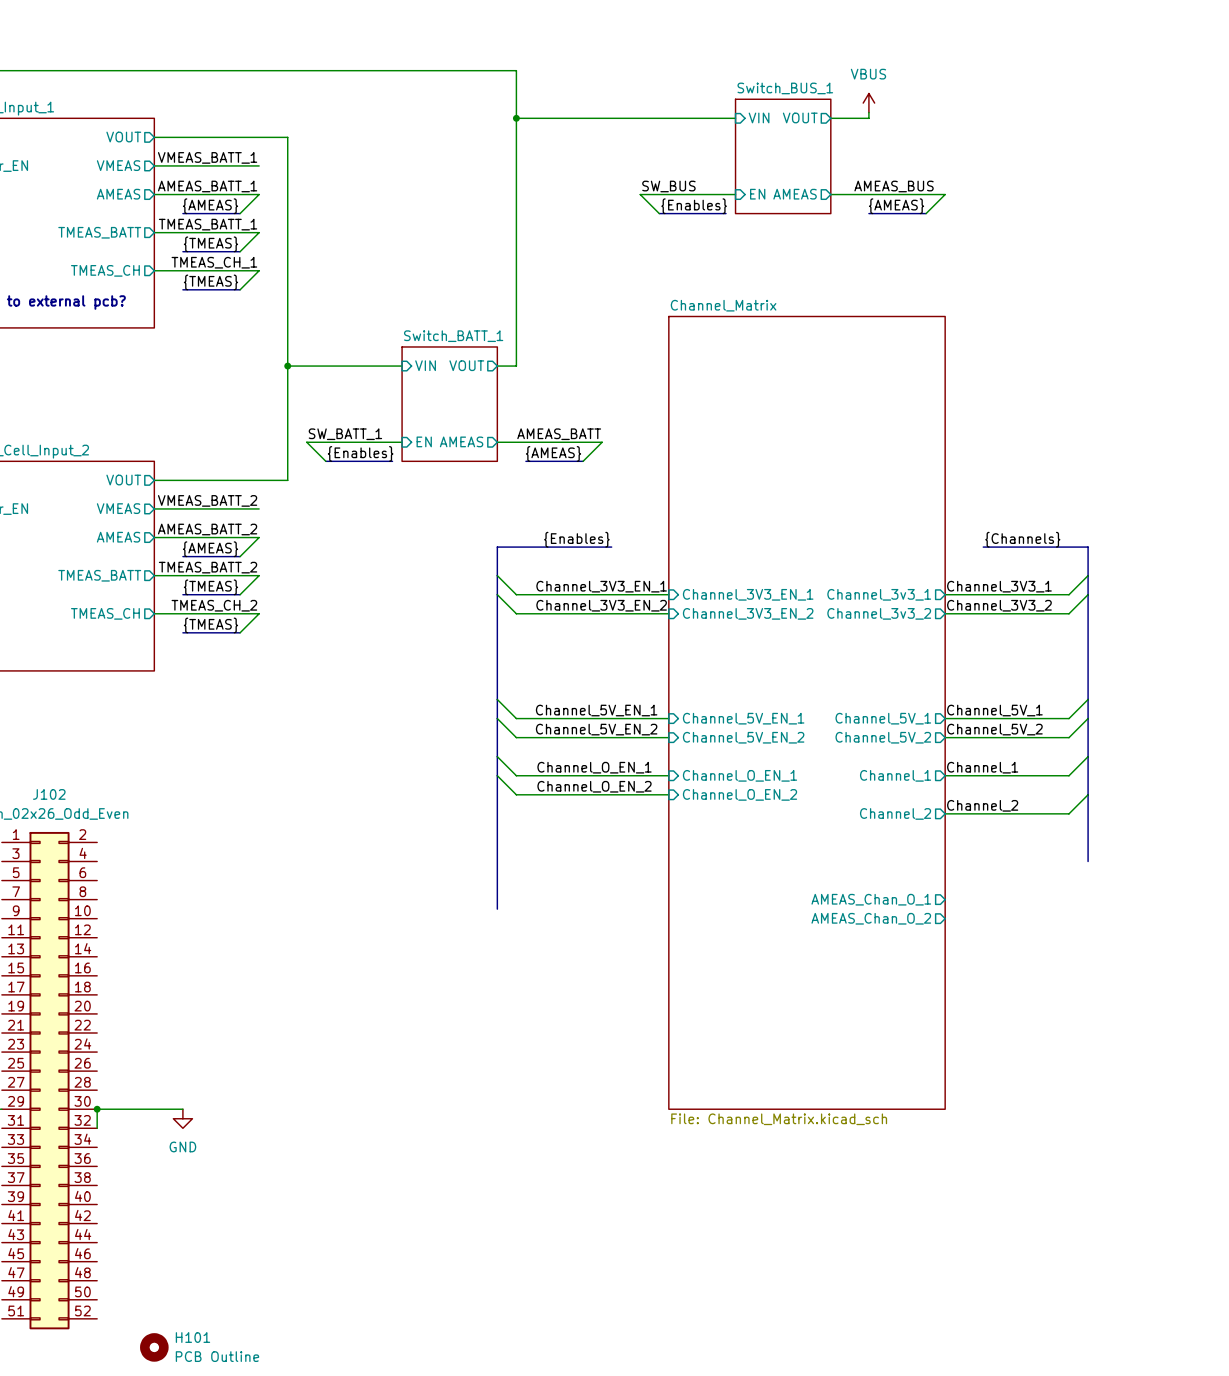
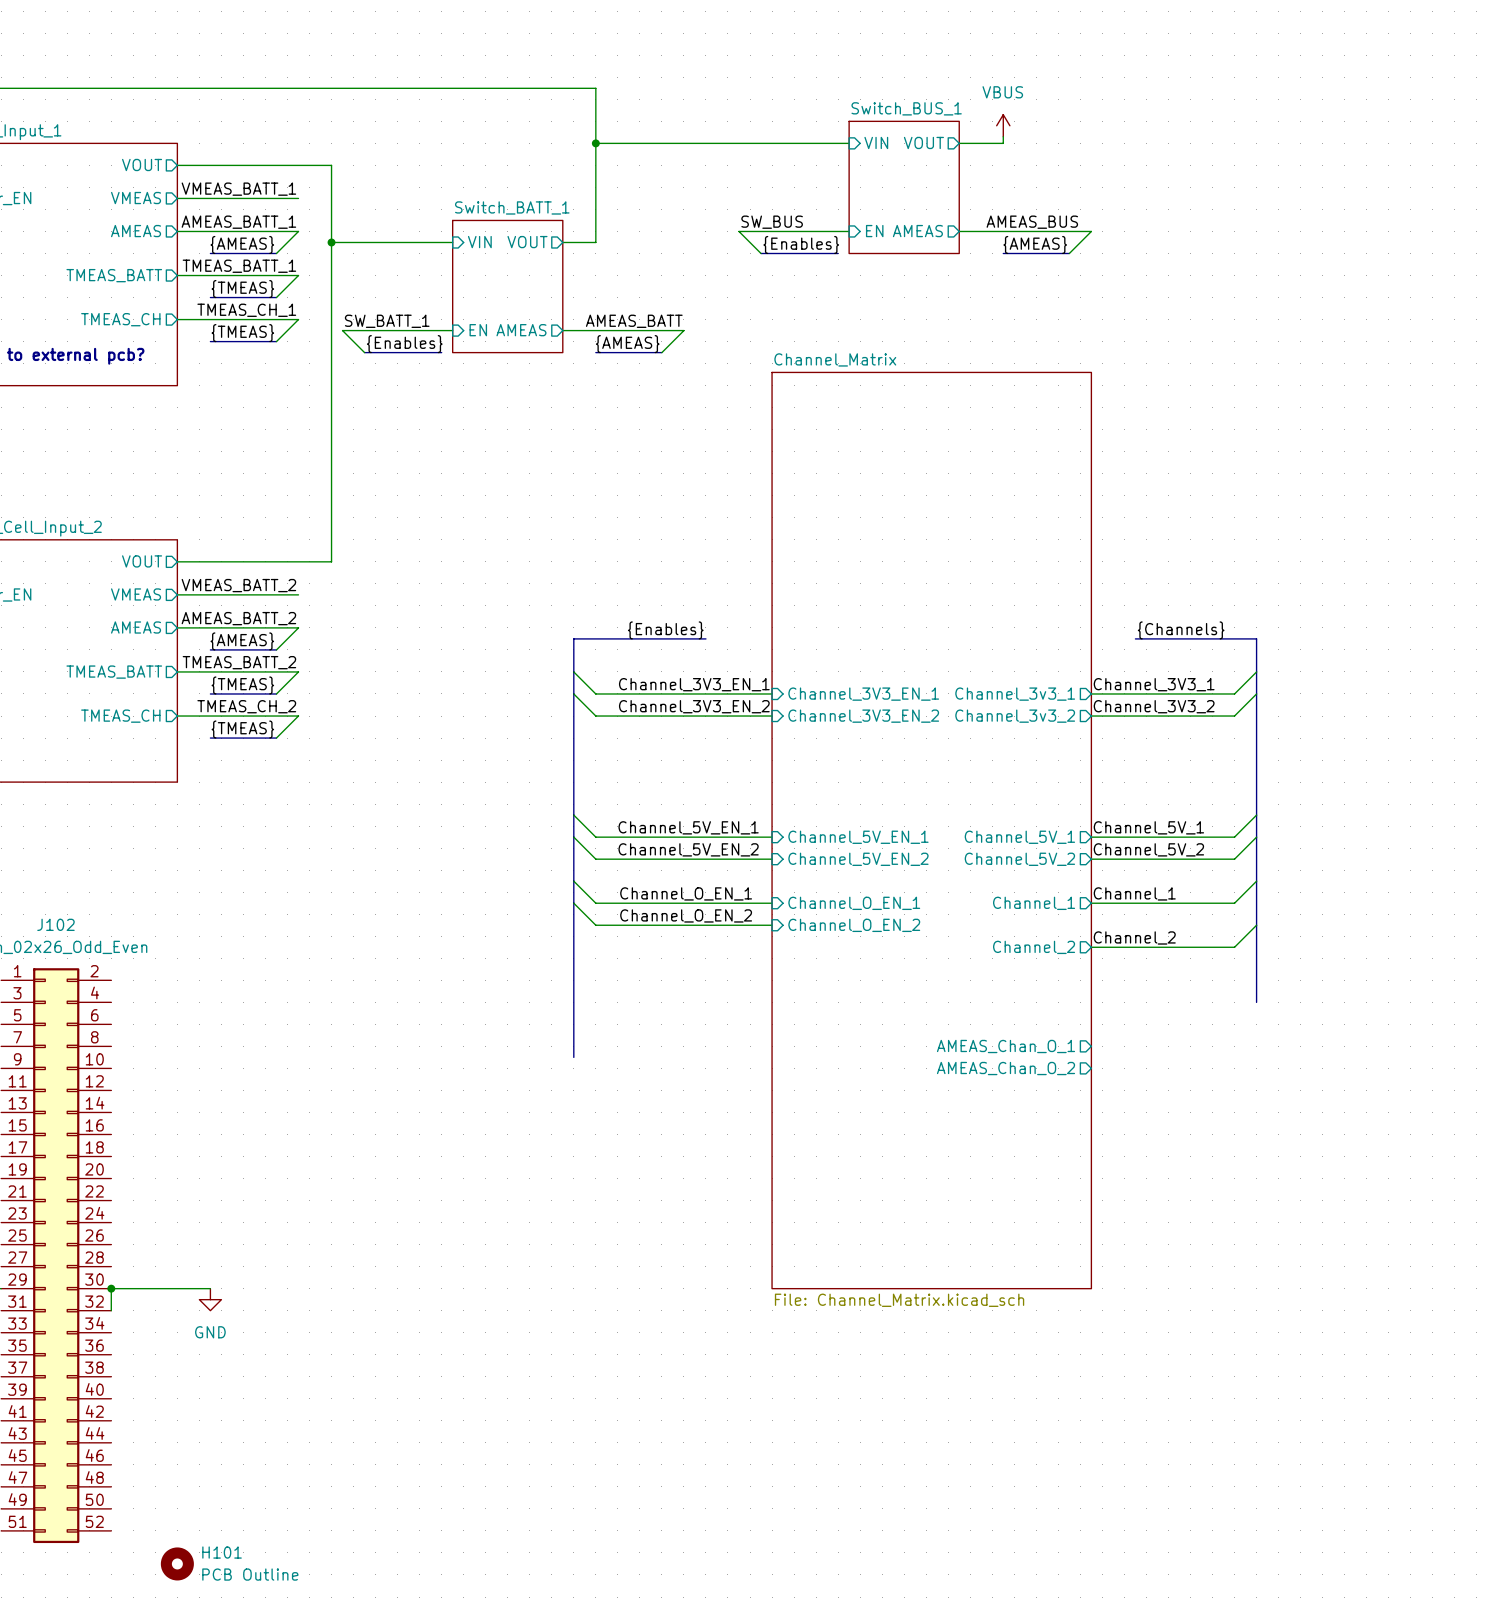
wire: none -> (331, 242) (452, 242)
junction: none -> (331, 242)
wire: (516, 204) (516, 366) (497, 366) -> (595, 242) (562, 242)
sheet pin position: VIN (425, 365) -> VIN (479, 242)
sheet pin position: VOUT (466, 365) -> VOUT (527, 242)
wire: (287, 366) (402, 366) -> none
junction: (287, 366) -> none
sheet Switch_BATT_1 position: (449, 404) -> (507, 286)
label position: SW_BATT_1 (345, 434) -> SW_BATT_1 (387, 321)
label position: AMEAS_BATT (559, 434) -> AMEAS_BATT (634, 321)
sheet pin position: EN (424, 441) -> EN (478, 330)
sheet pin position: AMEAS (461, 441) -> AMEAS (521, 330)
wire: (402, 442) (306, 442) (325, 461) -> (452, 330) (342, 330) (364, 352)
wire: (497, 442) (602, 442) (583, 461) -> (562, 330) (683, 330) (661, 352)
label position: {Enables} (360, 453) -> {Enables} (404, 344)
label position: {AMEAS} (553, 453) -> {AMEAS} (627, 344)
bus: (325, 461) (392, 461) -> (364, 352) (441, 352)
bus: (525, 461) (583, 461) -> (595, 352) (661, 352)

